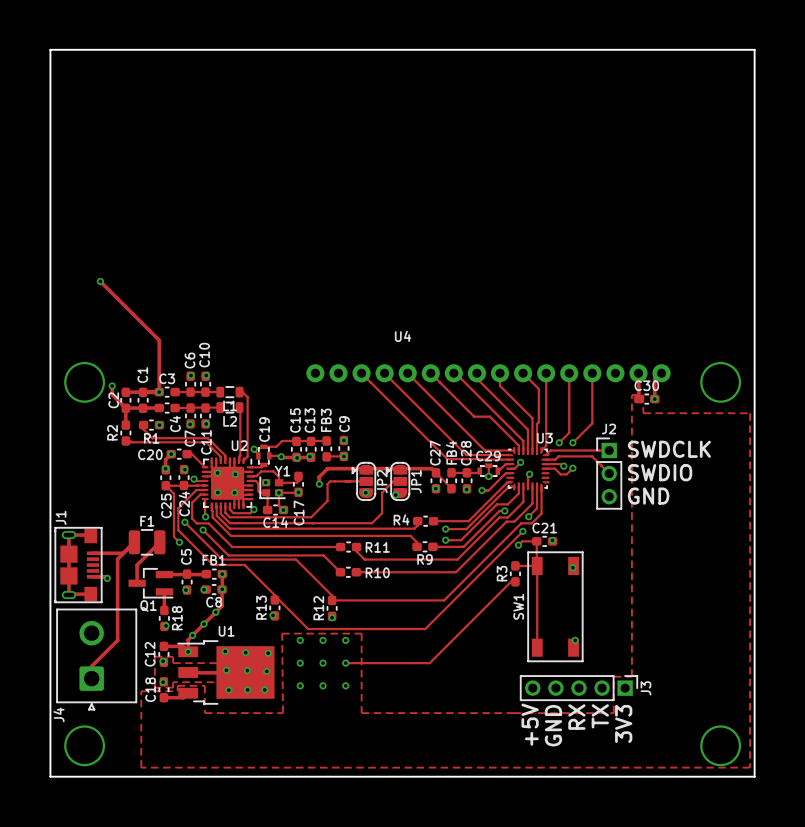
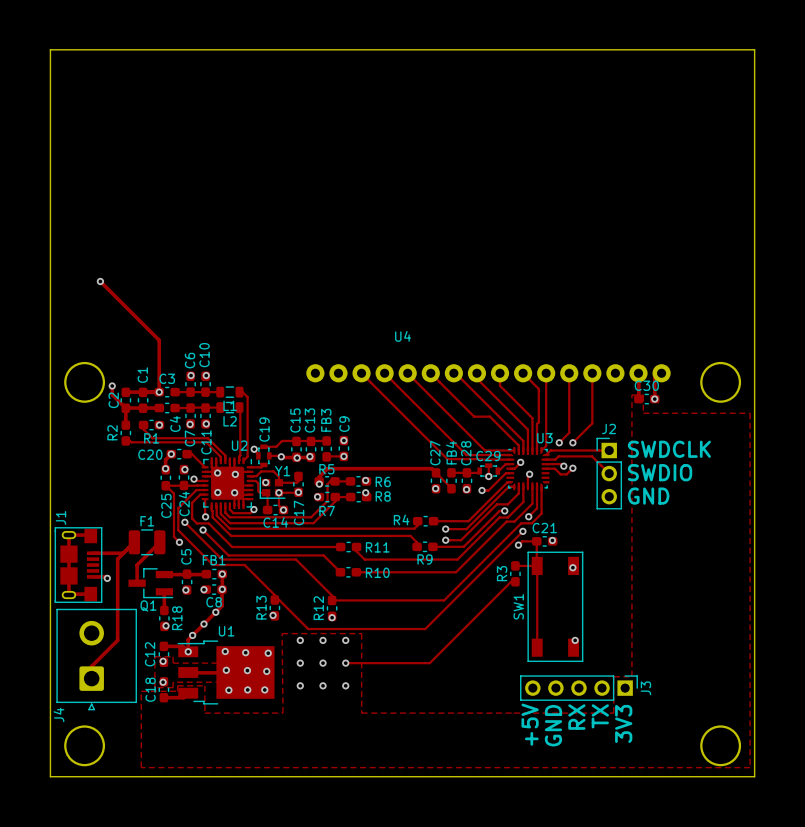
R5: none -> (327, 481)
track: (350, 481) (366, 481) -> none
R6: none -> (358, 481)
JP2: (363, 481) -> none
JP1: (397, 481) -> none
track: (400, 481) (393, 481) (382, 492) (382, 513) (372, 523) (313, 523) -> (350, 497) (335, 497) (335, 501) (313, 523)
via position: (395, 495) -> (365, 480)
via: none -> (317, 496)
R7: none -> (327, 497)
R8: none -> (358, 497)

